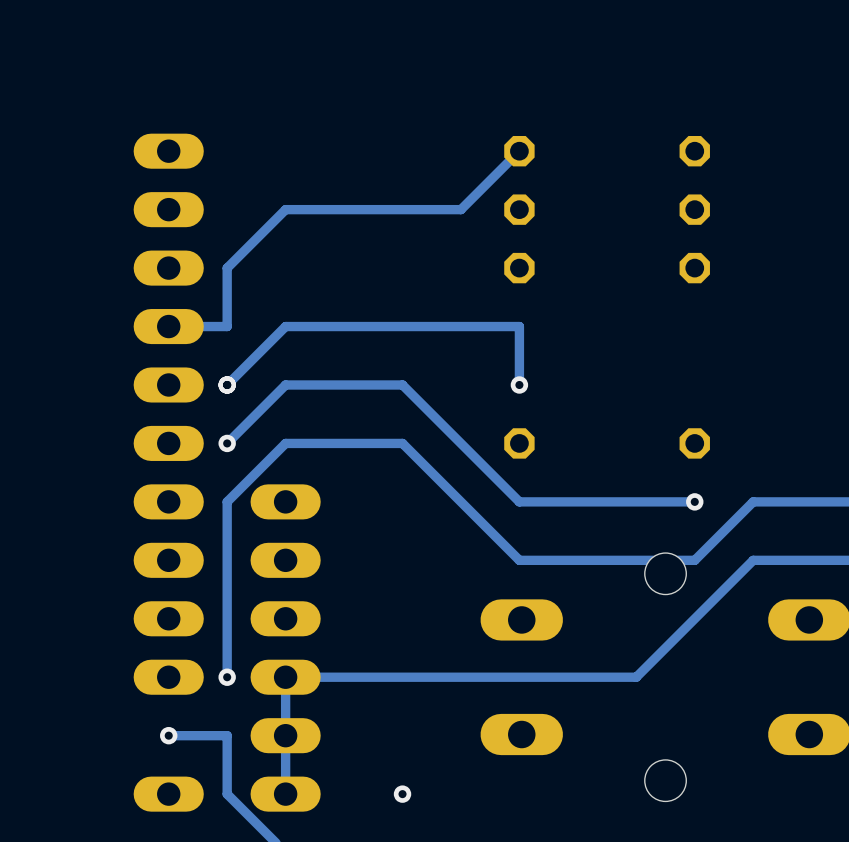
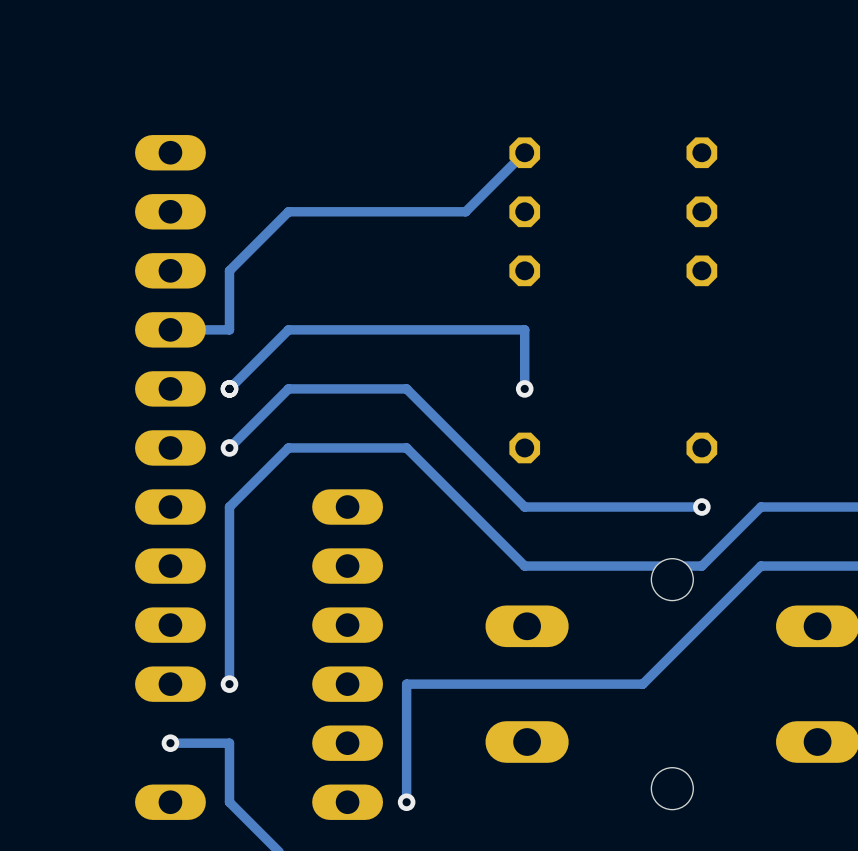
part position: (285, 648) -> (347, 654)
track: (402, 677) (285, 677) (285, 794) -> (406, 684) (406, 802)

